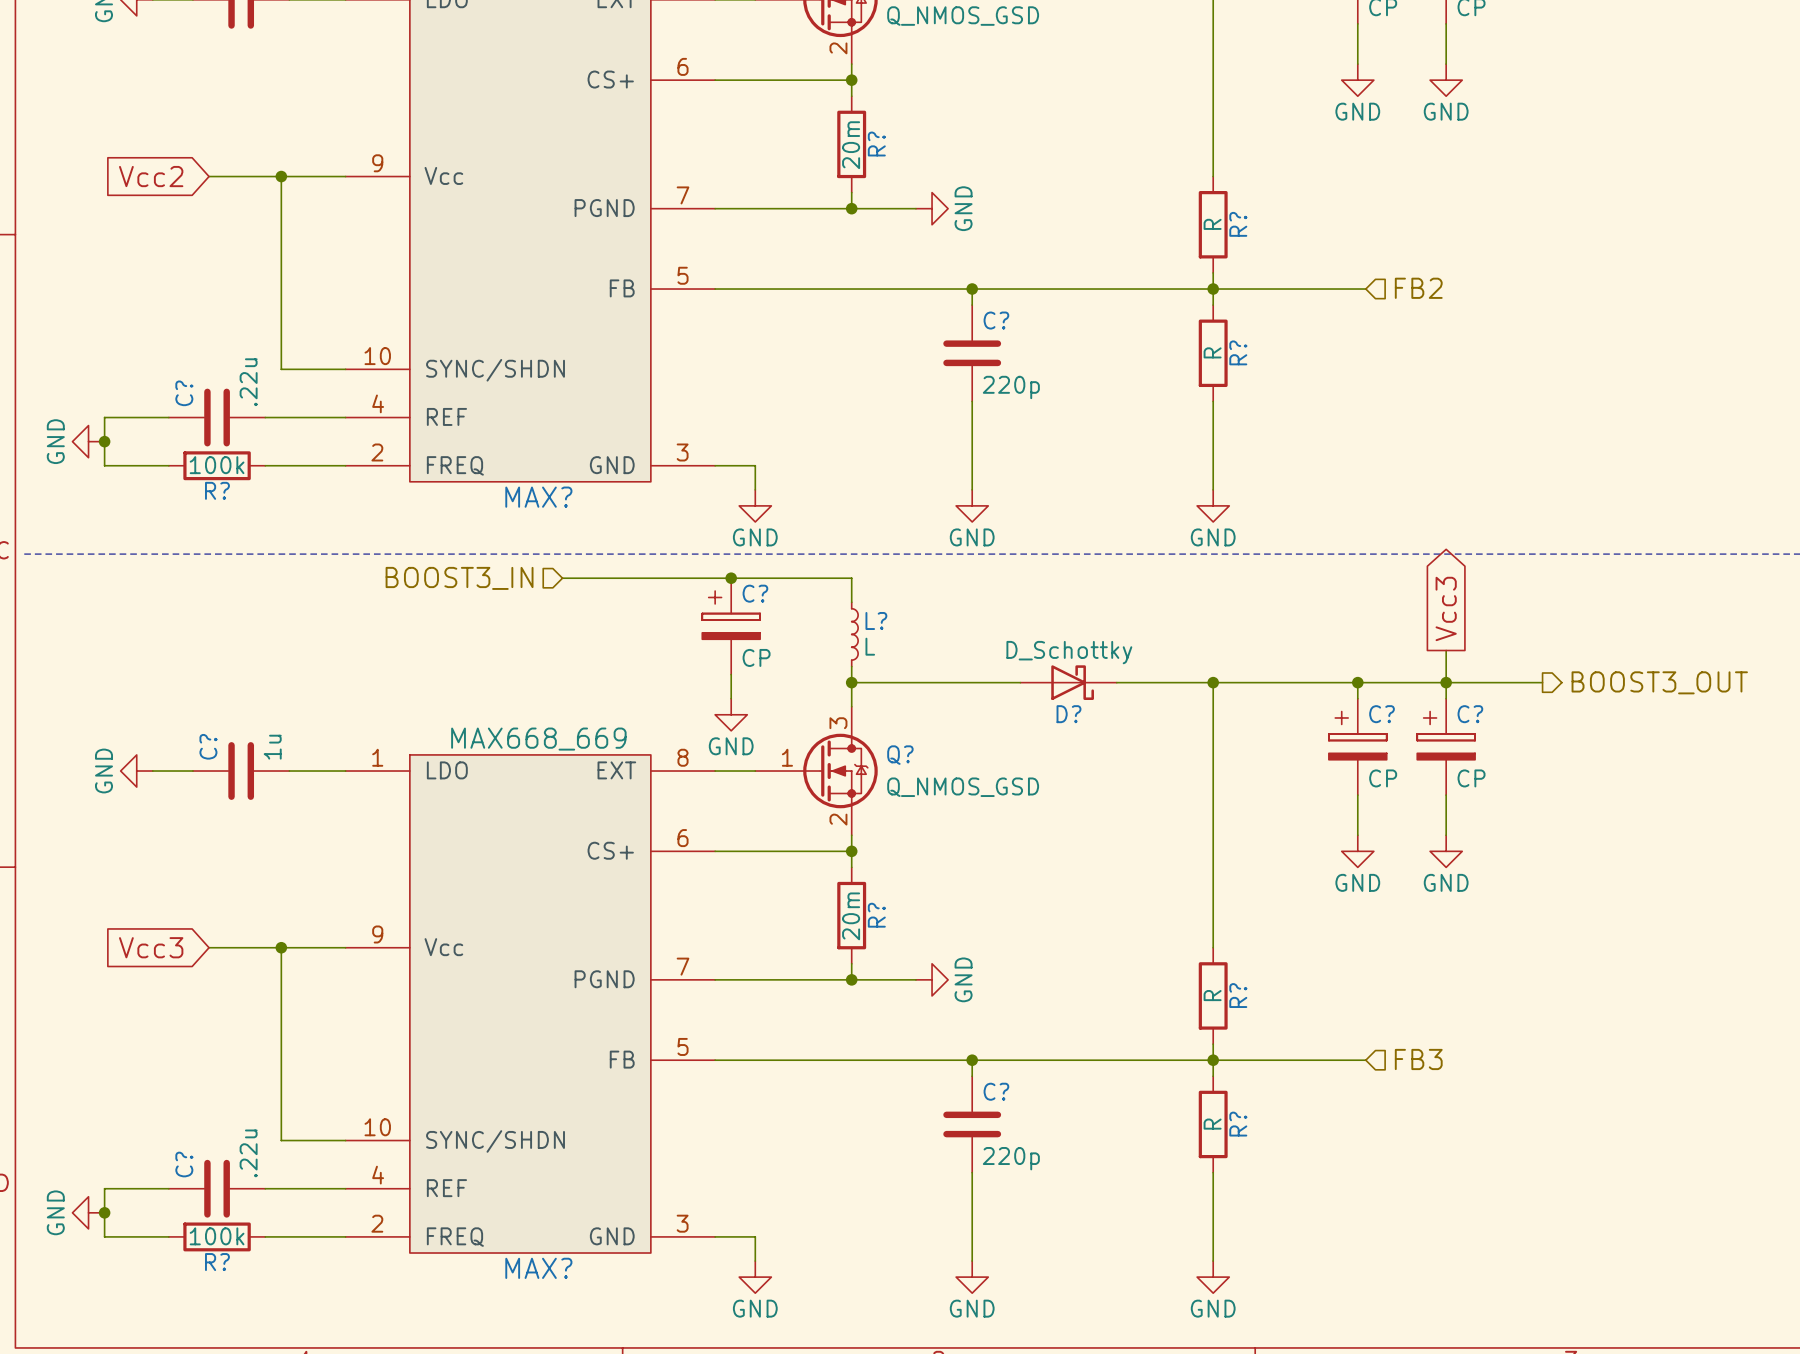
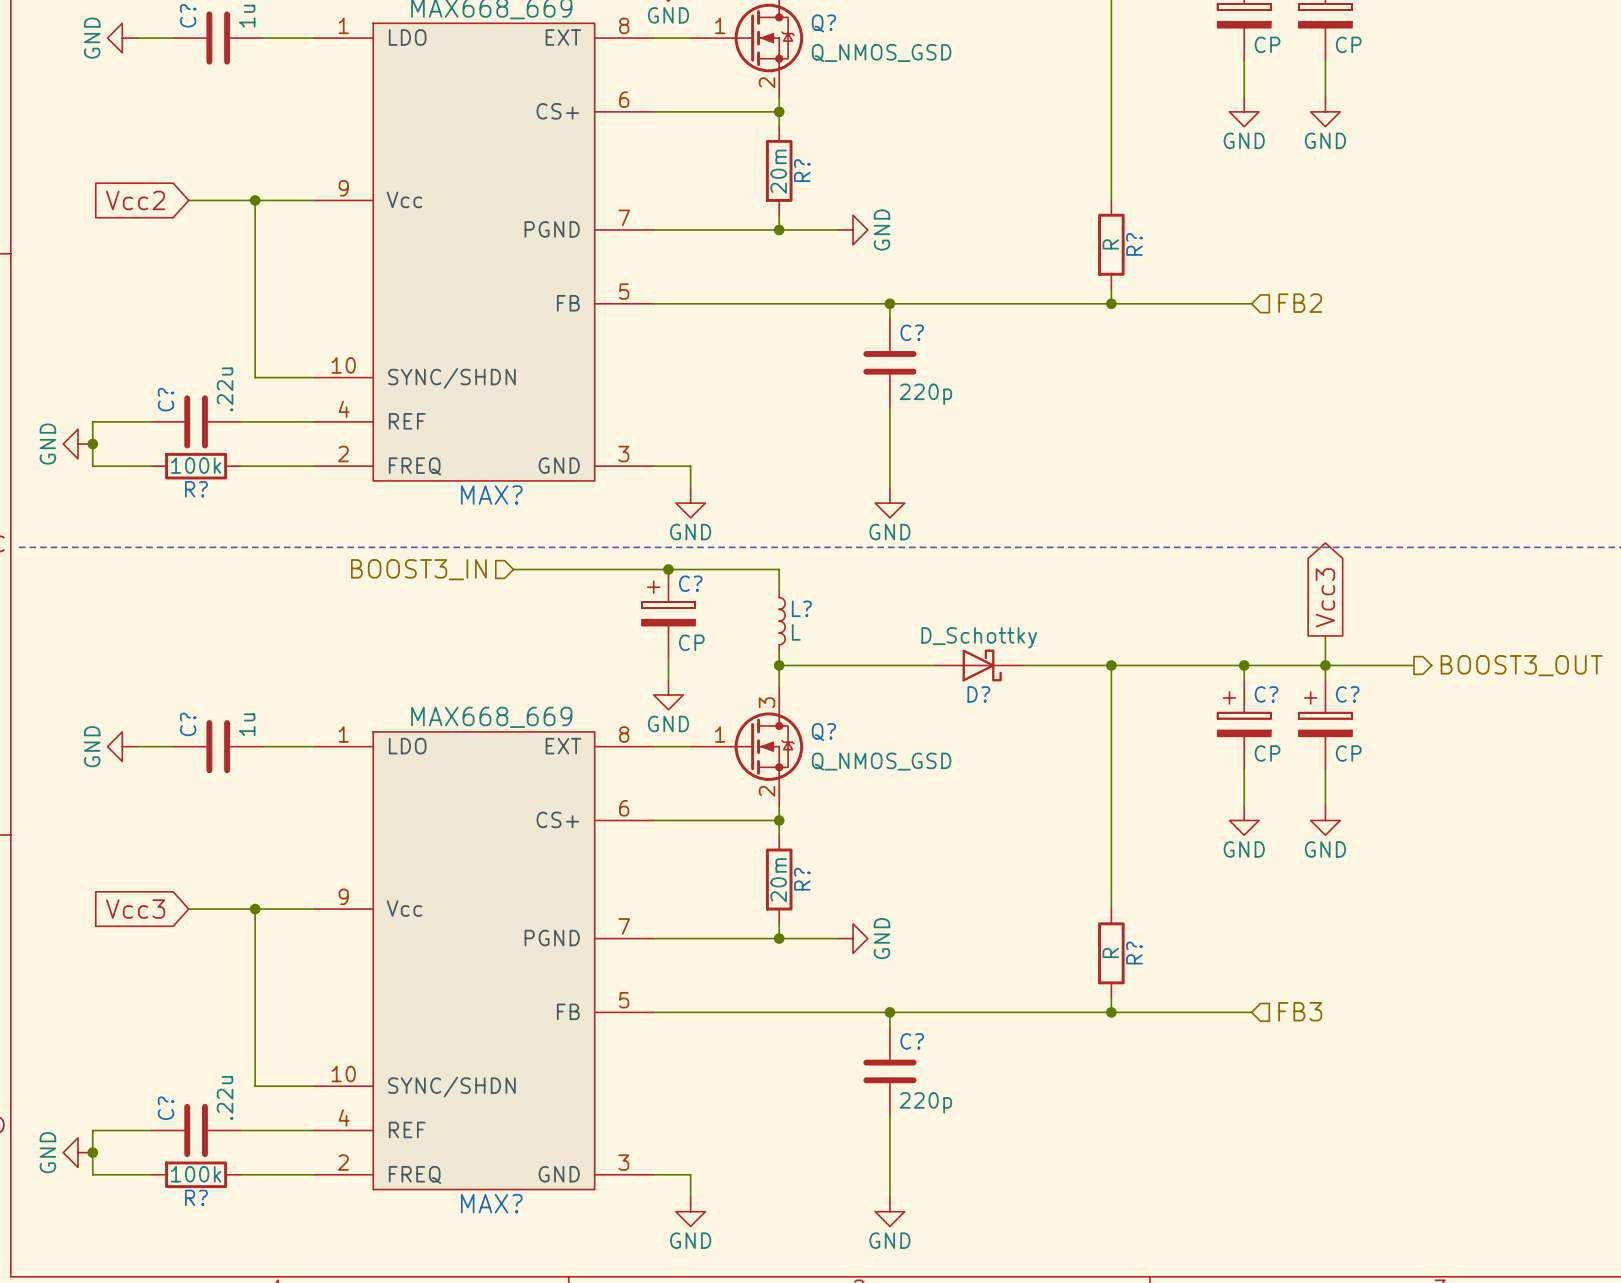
wire: (1213, 289) (1213, 305) -> none
R?: R (1213, 353) -> none
wire: (1213, 401) (1213, 489) -> none
power symbol: GND (1213, 505) -> none
wire: (1213, 1060) (1213, 1076) -> none
R?: R (1213, 1124) -> none
wire: (1213, 1172) (1213, 1261) -> none
power symbol: GND (1213, 1277) -> none

